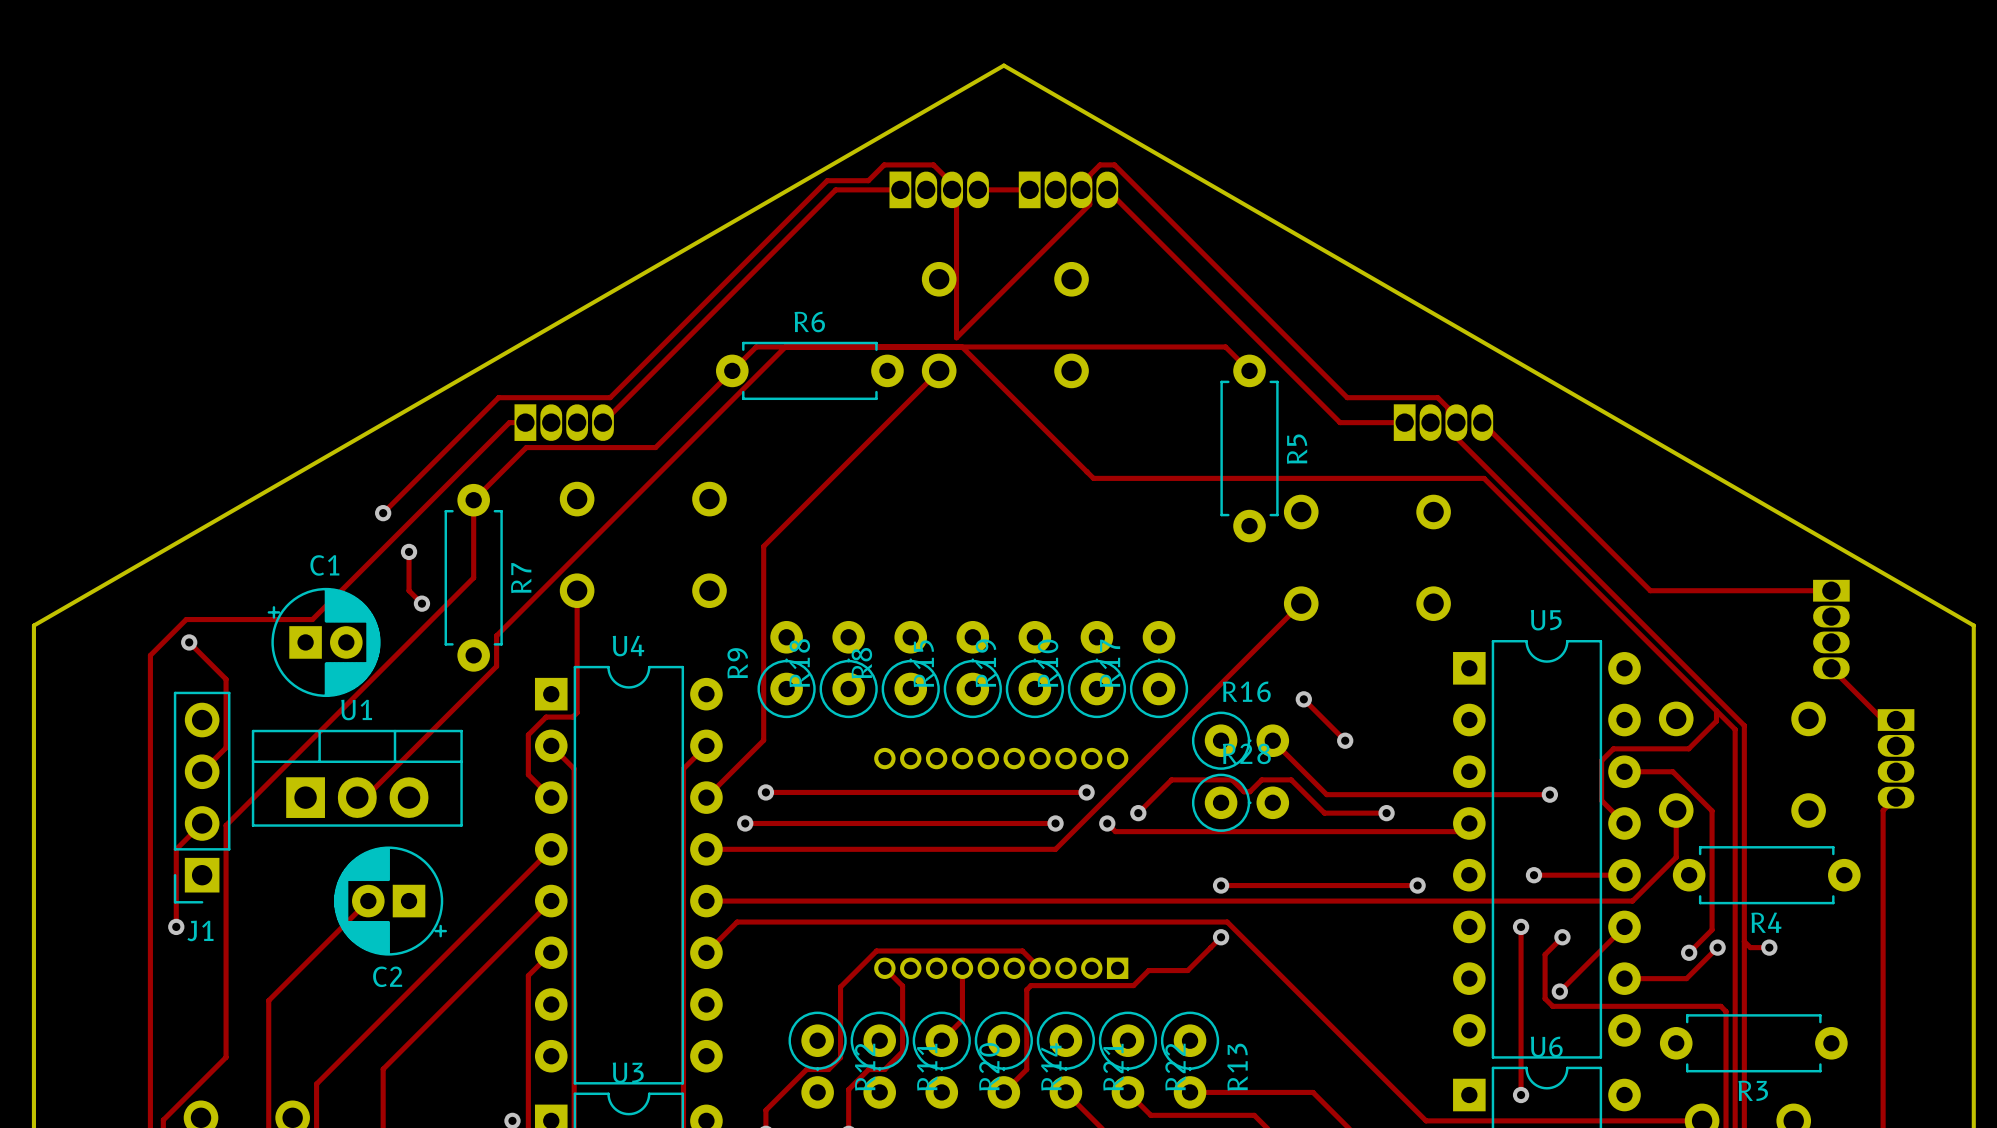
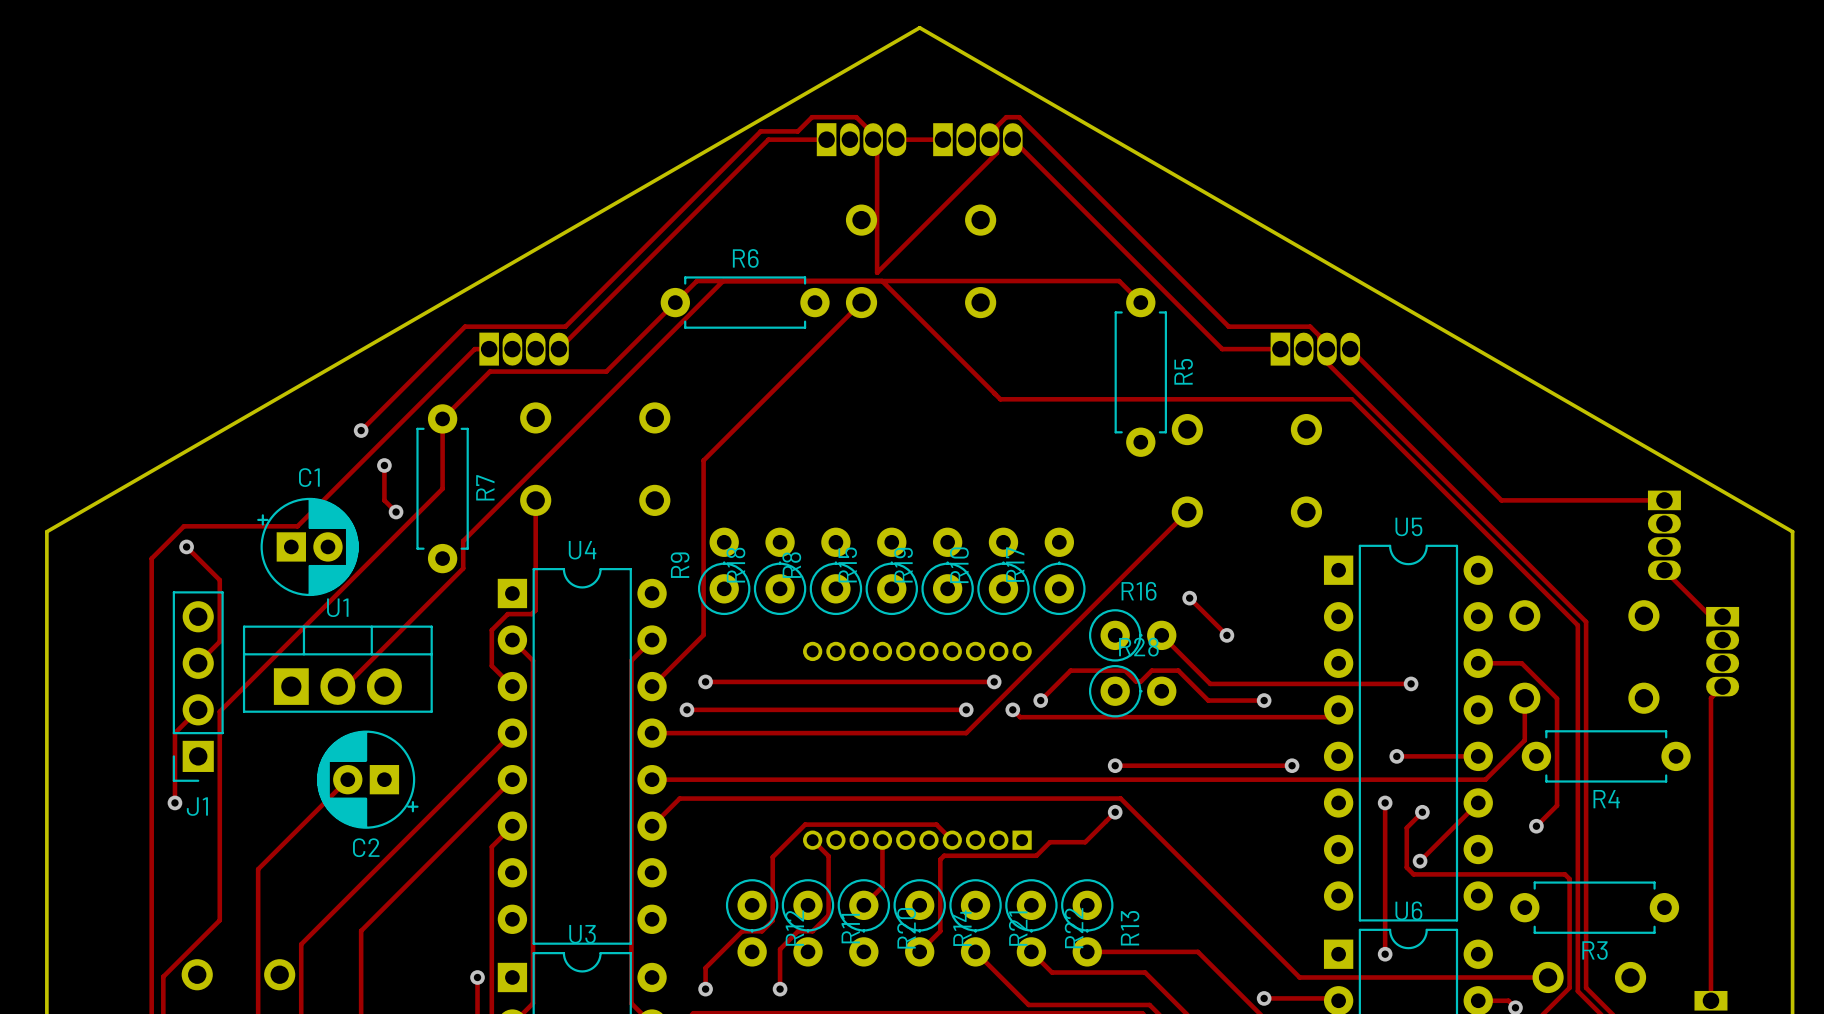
track: (1716, 710) (1716, 721) (1688, 748) (1613, 748) (1601, 760) (1601, 800) (1624, 823) -> none
track: (1744, 941) (1750, 947) (1769, 947) -> none
track: (1717, 947) (1686, 978) (1624, 978) -> none
via: (1717, 947) -> none
via: (1769, 947) -> none

